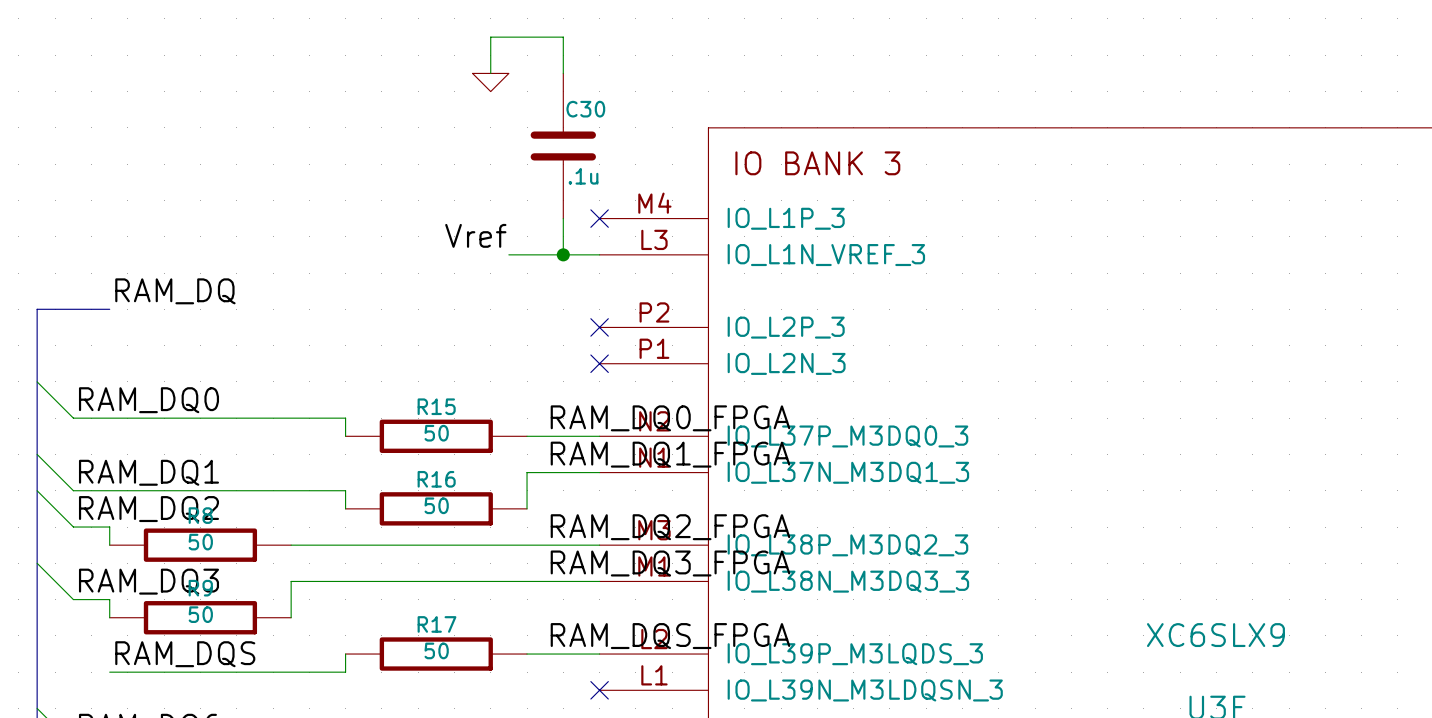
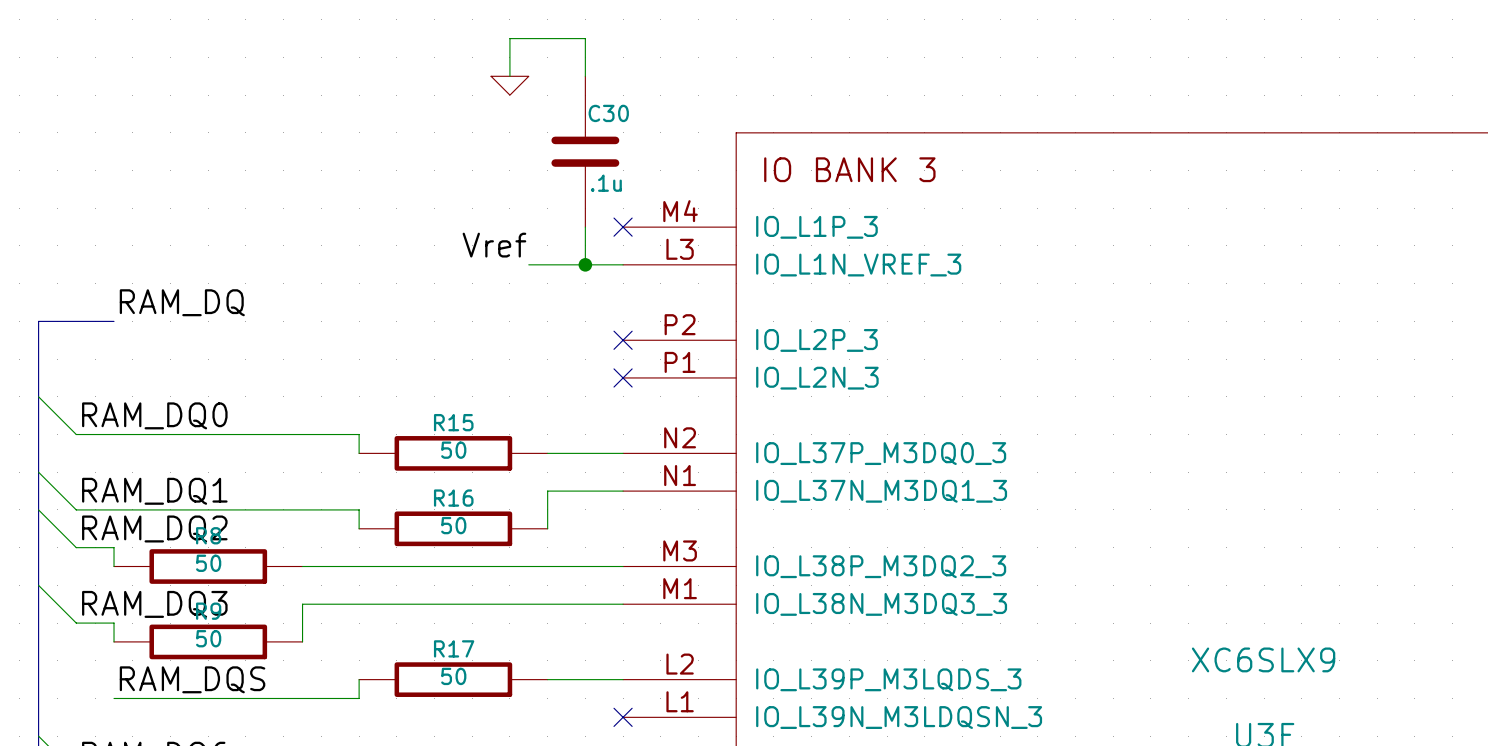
label: RAM_DQ0_FPGA (670, 418) -> none
label: RAM_DQ1_FPGA (670, 454) -> none
label: RAM_DQ2_FPGA (670, 527) -> none
label: RAM_DQ3_FPGA (670, 563) -> none
label: RAM_DQS_FPGA (670, 636) -> none

